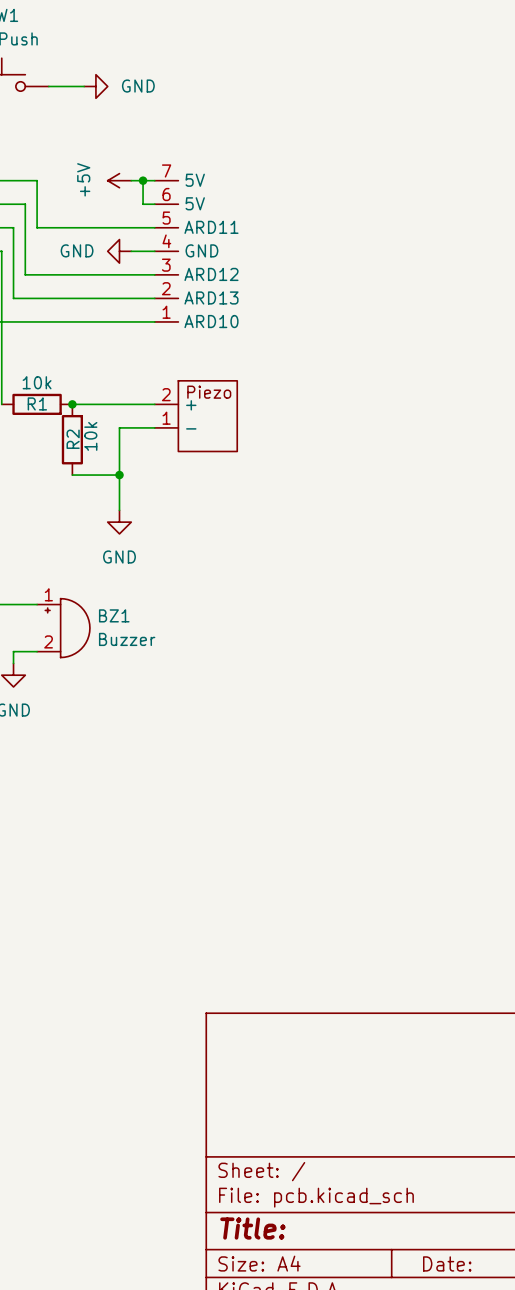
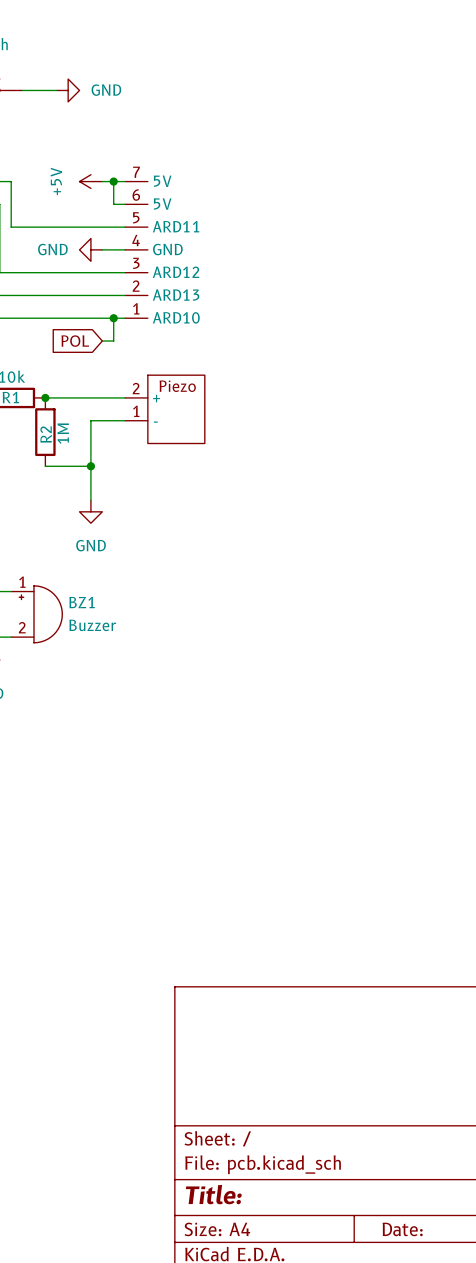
wire: none -> (113, 318) (113, 341) (102, 341)
junction: none -> (113, 318)
global label: none -> POL (75, 341)
R2 value: 10k (90, 436) -> 1M (63, 433)

